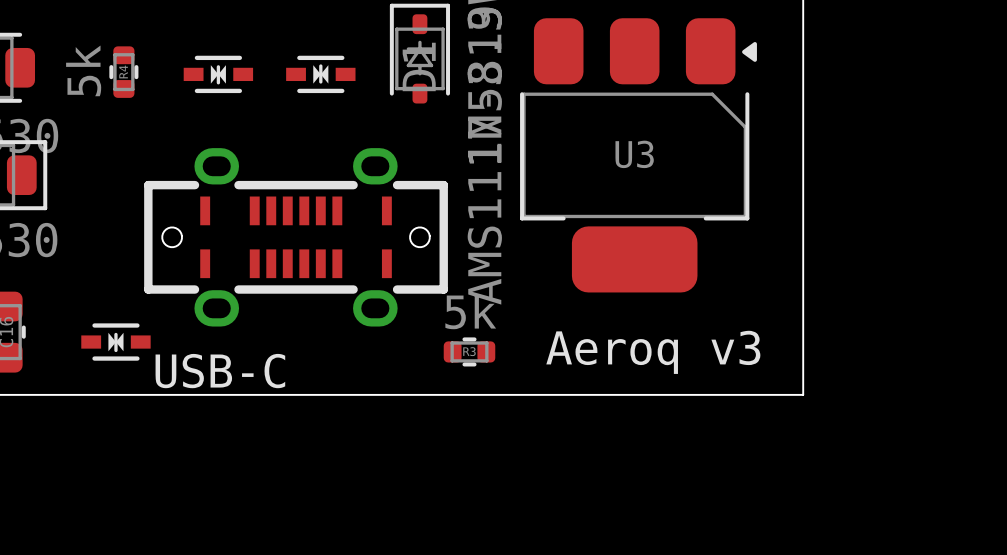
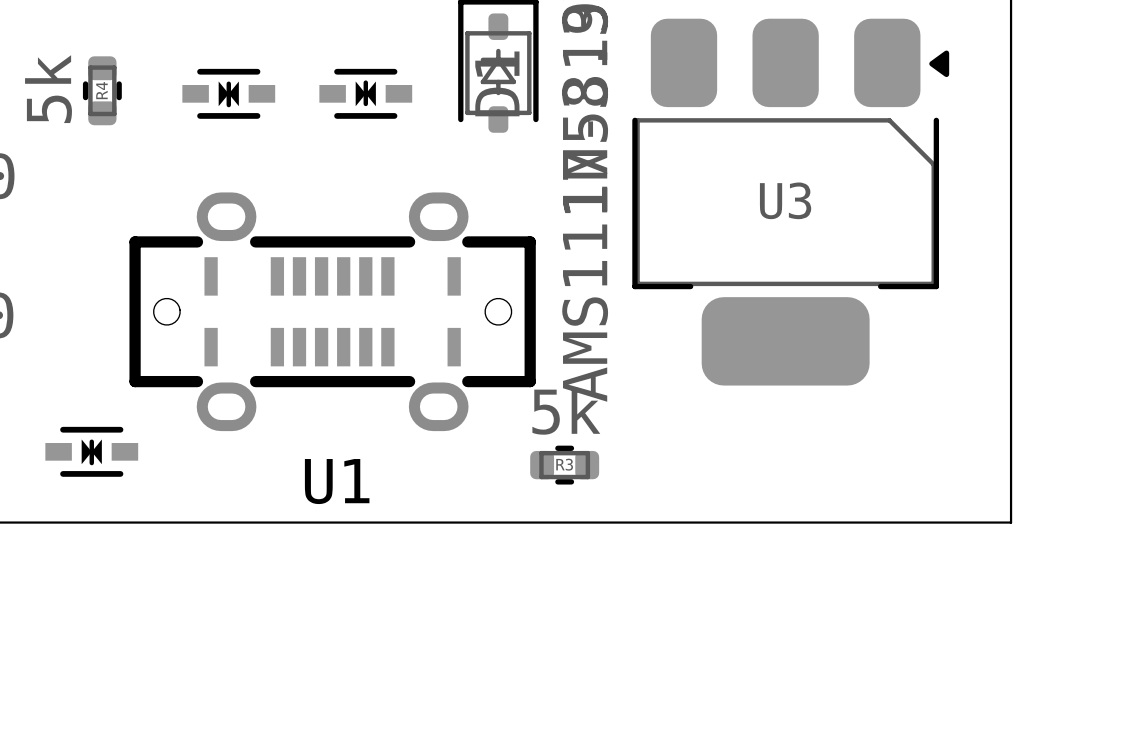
text: Aeroq v3 (653, 352) -> none
U1 name: none -> U1 (337, 481)
text: USB-C (220, 371) -> none

